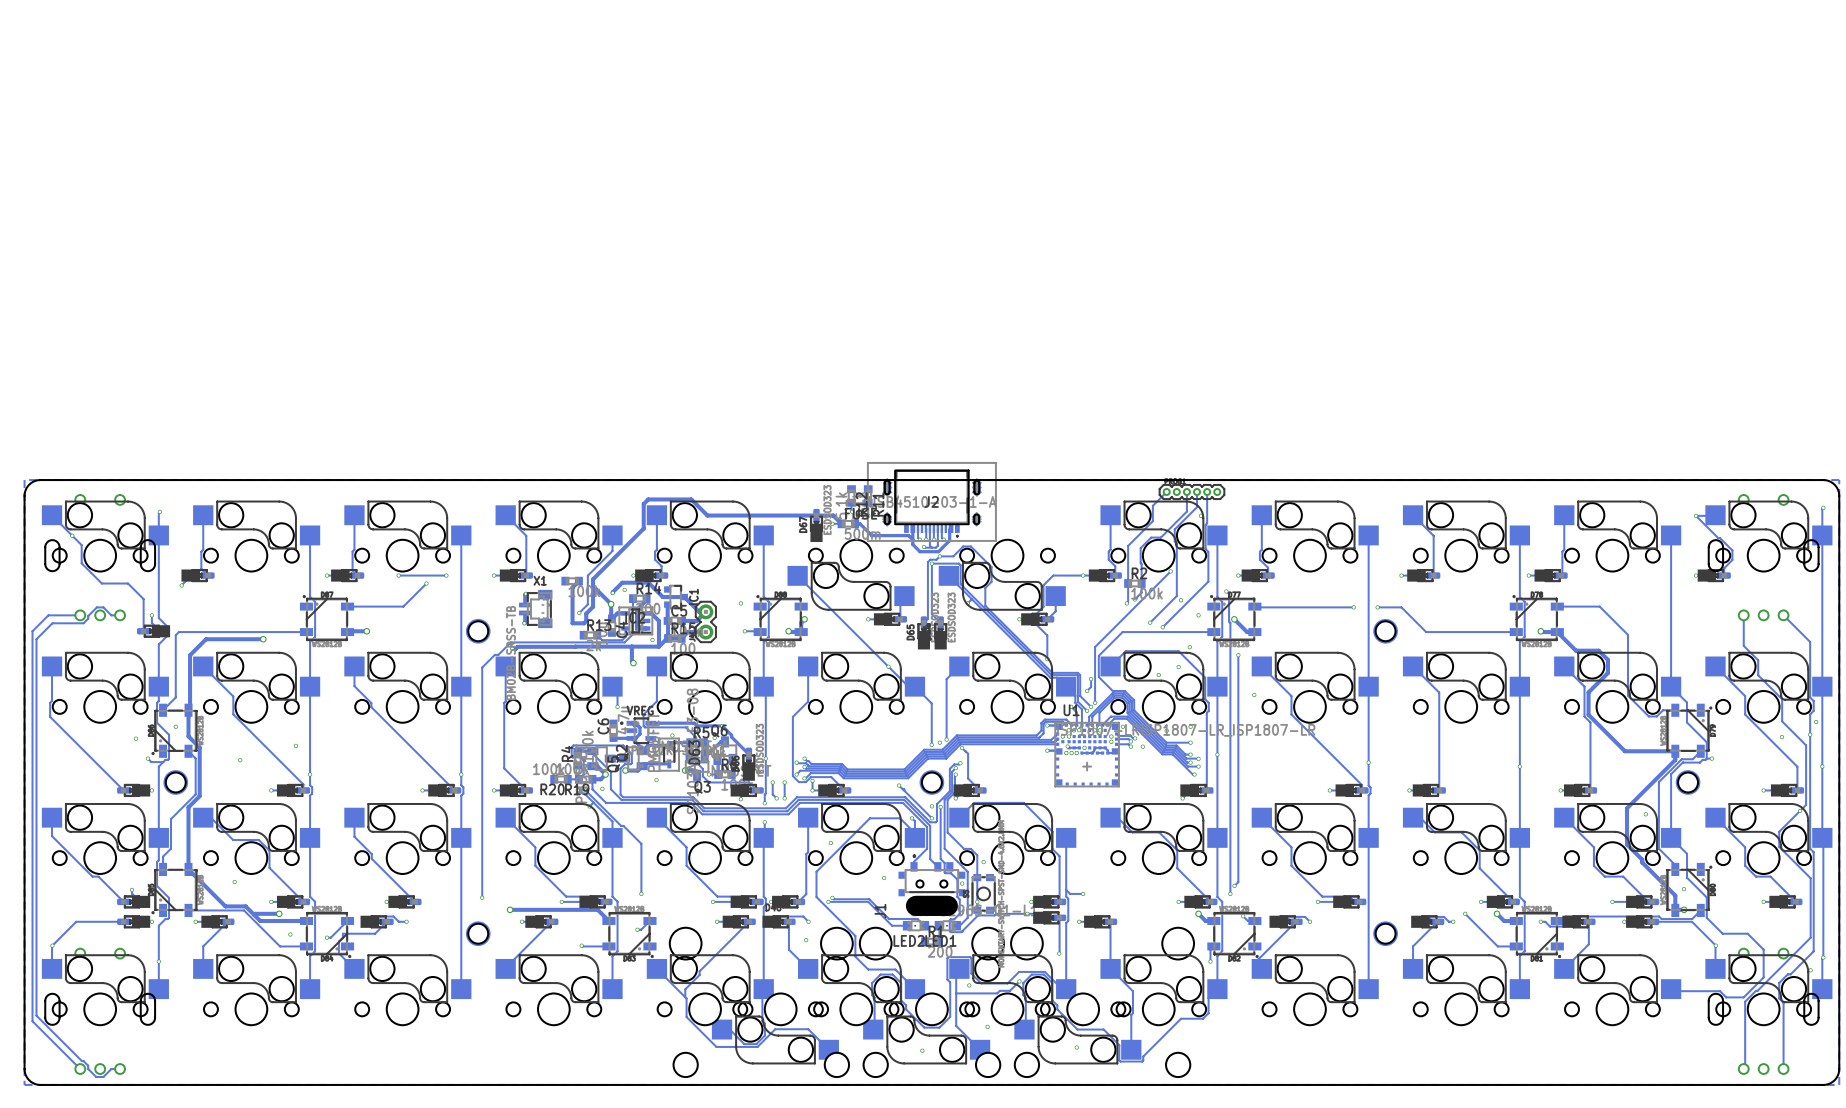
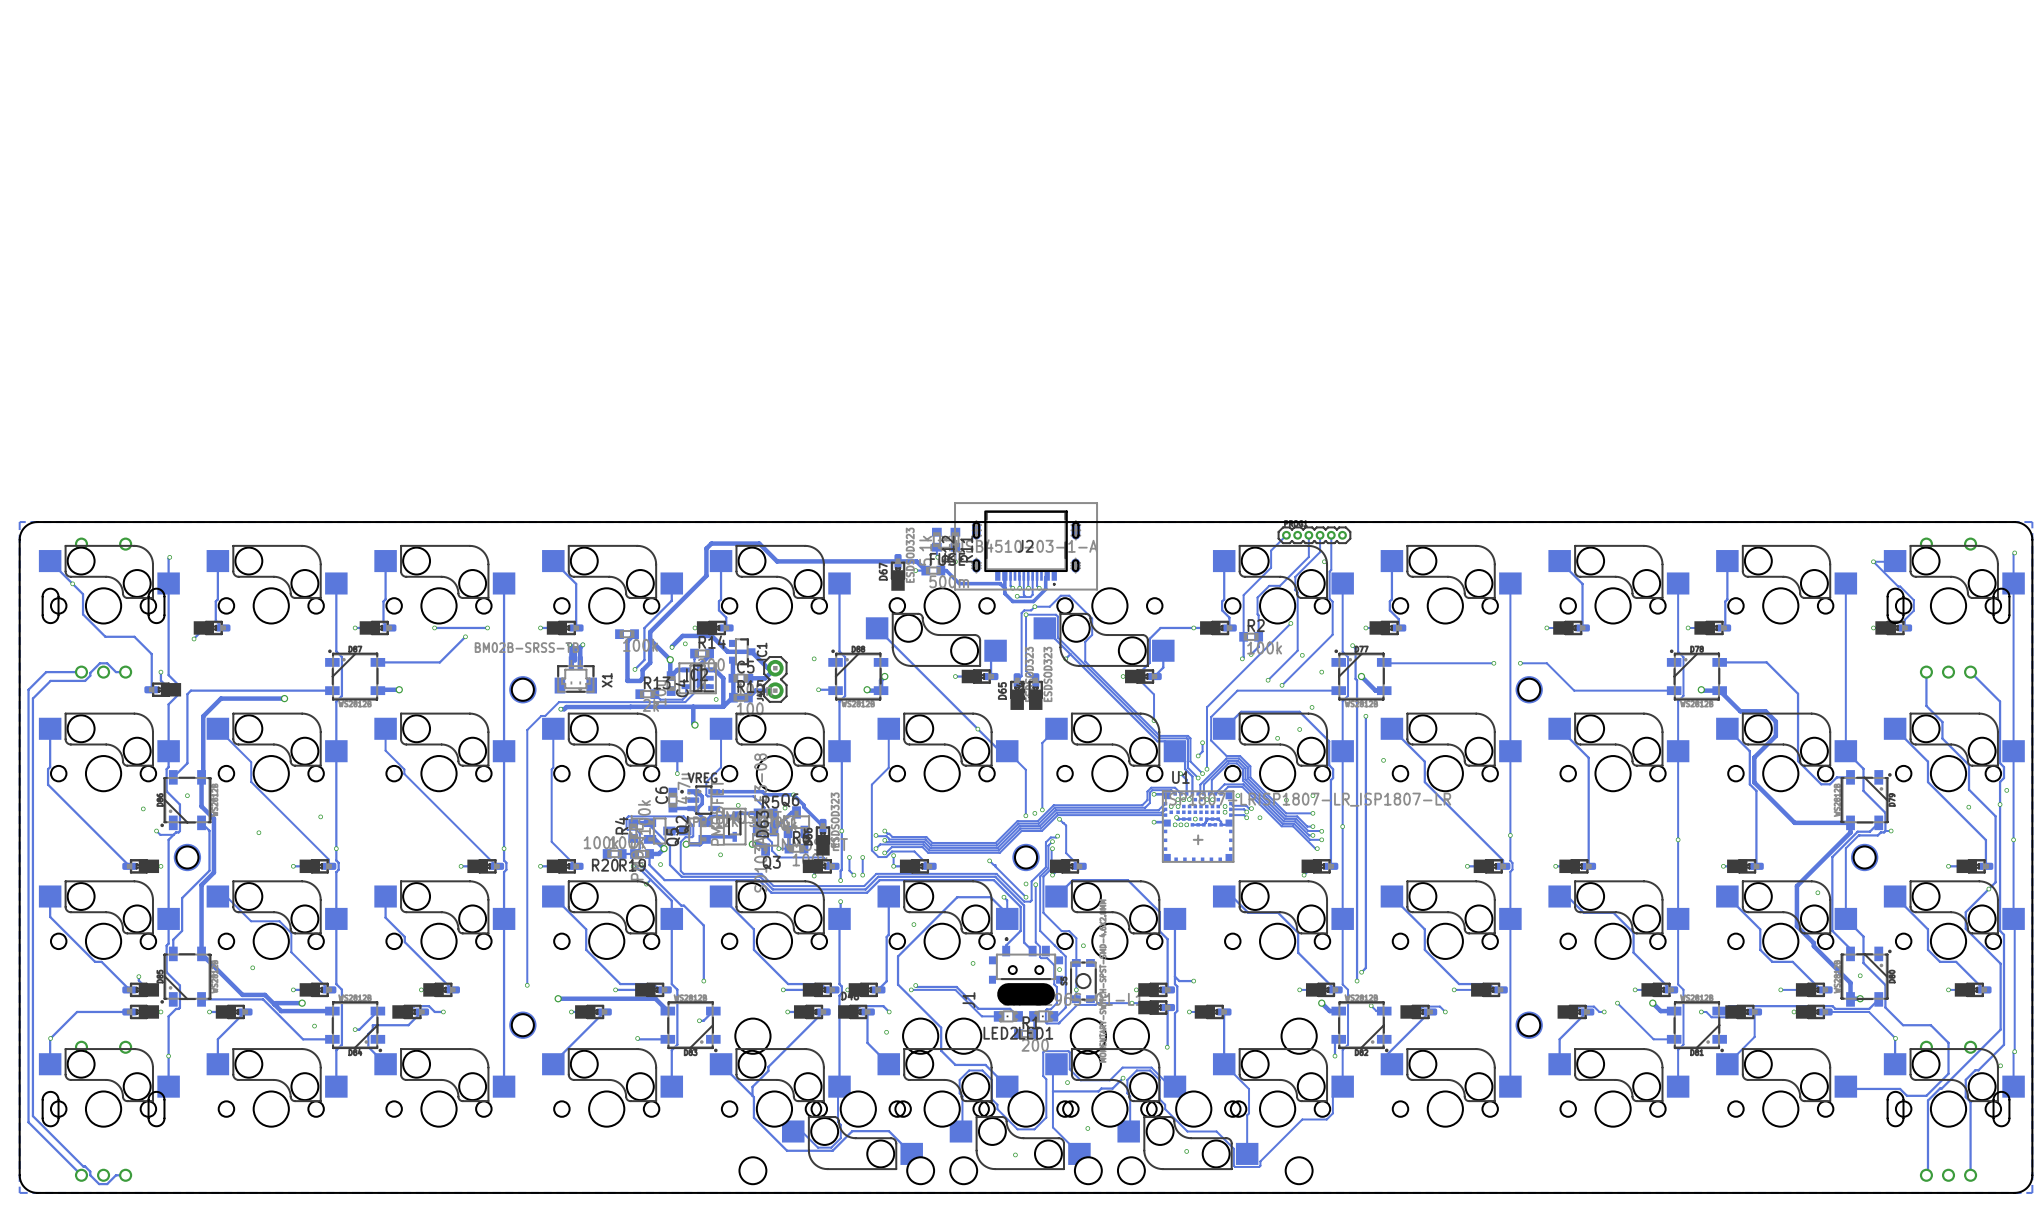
track: none -> (569, 644) (571, 646) (571, 663)
via: none -> (569, 644)
track: none -> (582, 644) (580, 647) (580, 663)
via: none -> (582, 644)
via: (525, 593) -> none
X1 rotation: 0° (535, 608) -> 90° clockwise (575, 674)
track: (525, 612) (524, 623) -> none
via: (524, 623) -> none

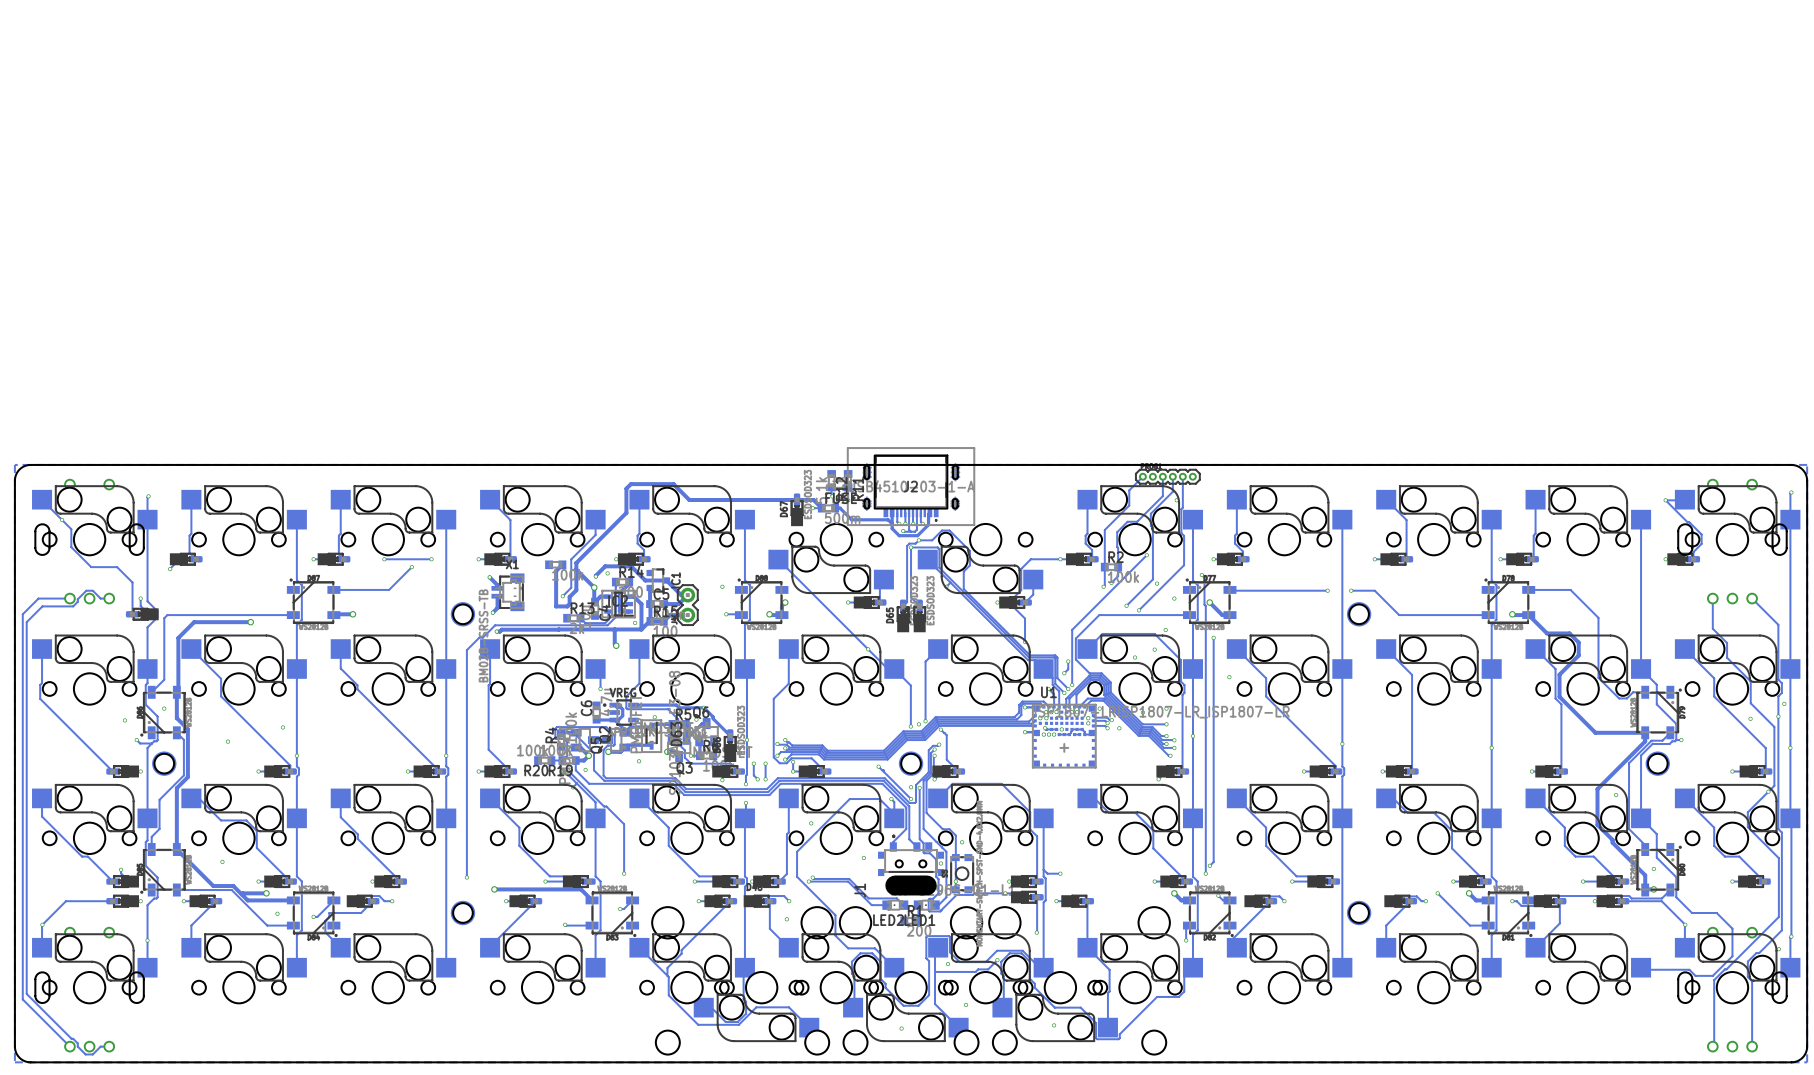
track: (569, 644) (571, 646) (571, 663) -> none
via: (569, 644) -> none
track: (582, 644) (580, 647) (580, 663) -> none
via: (582, 644) -> none
track: none -> (489, 577) (497, 585) (497, 588)
via: none -> (489, 577)
track: (575, 648) (574, 660) -> none
track: none -> (497, 596) (497, 608) (492, 612)
X1 rotation: 0° (575, 674) -> 90° counterclockwise (507, 592)
via: none -> (492, 612)

